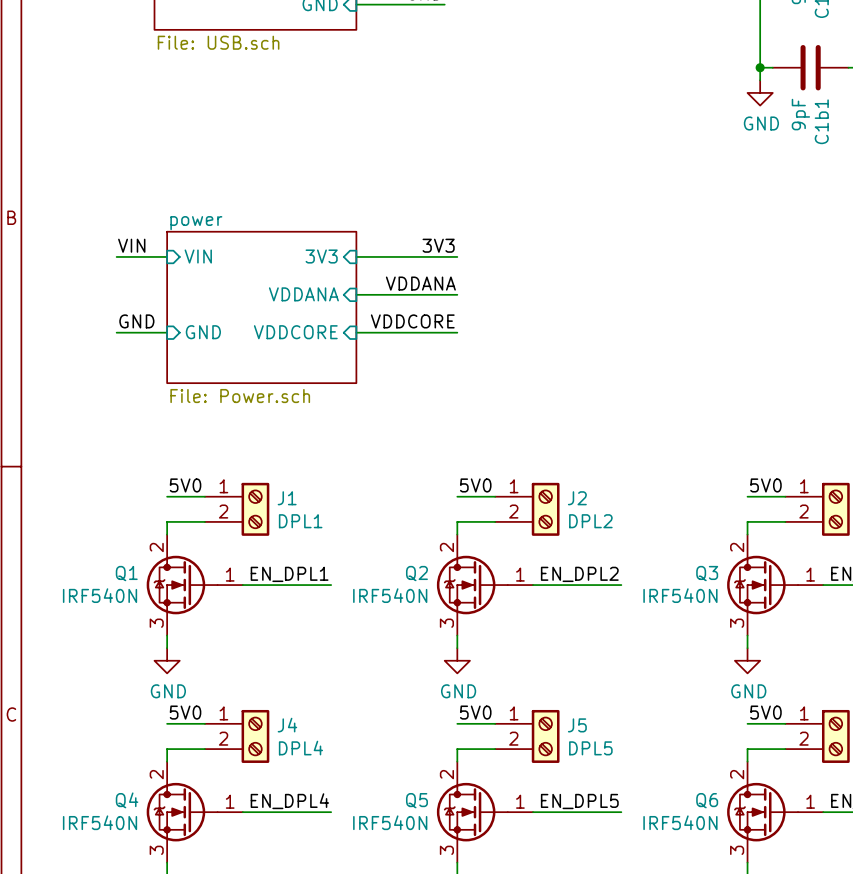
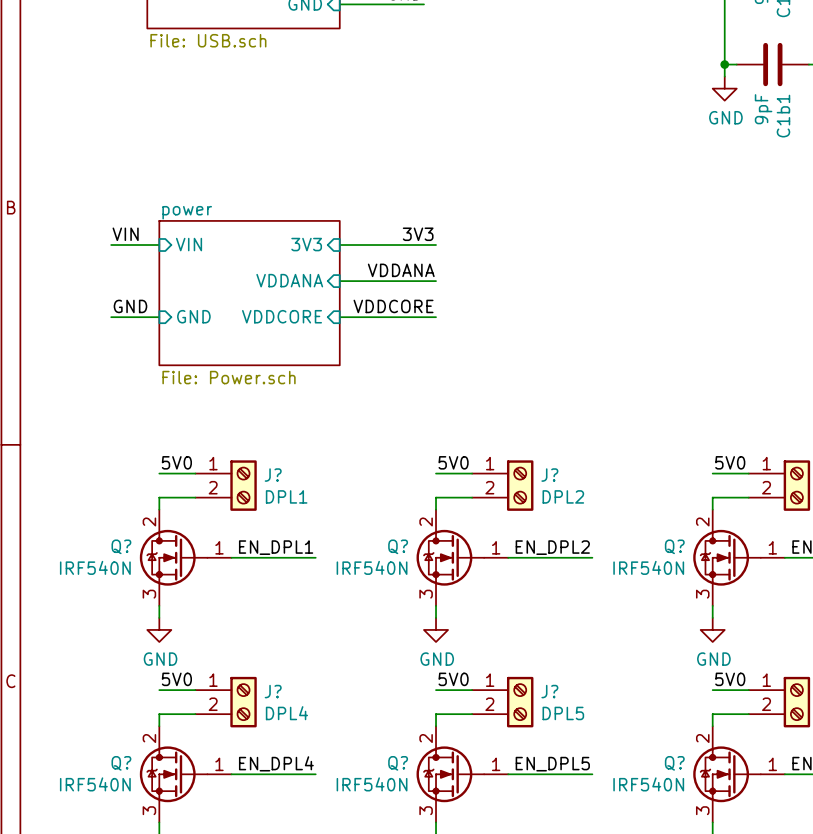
J1 name: J1 (287, 498) -> J? (273, 475)
J2 name: J2 (577, 498) -> J? (549, 475)
Q1 name: Q1 (126, 573) -> Q? (121, 546)
Q2 name: Q2 (416, 573) -> Q? (398, 546)
Q3 name: Q3 (707, 573) -> Q? (674, 546)
J4 name: J4 (287, 725) -> J? (273, 691)
J5 name: J5 (577, 725) -> J? (549, 691)
Q4 name: Q4 (127, 800) -> Q? (121, 763)
Q5 name: Q5 (416, 800) -> Q? (398, 763)
Q6 name: Q6 (707, 800) -> Q? (674, 763)

